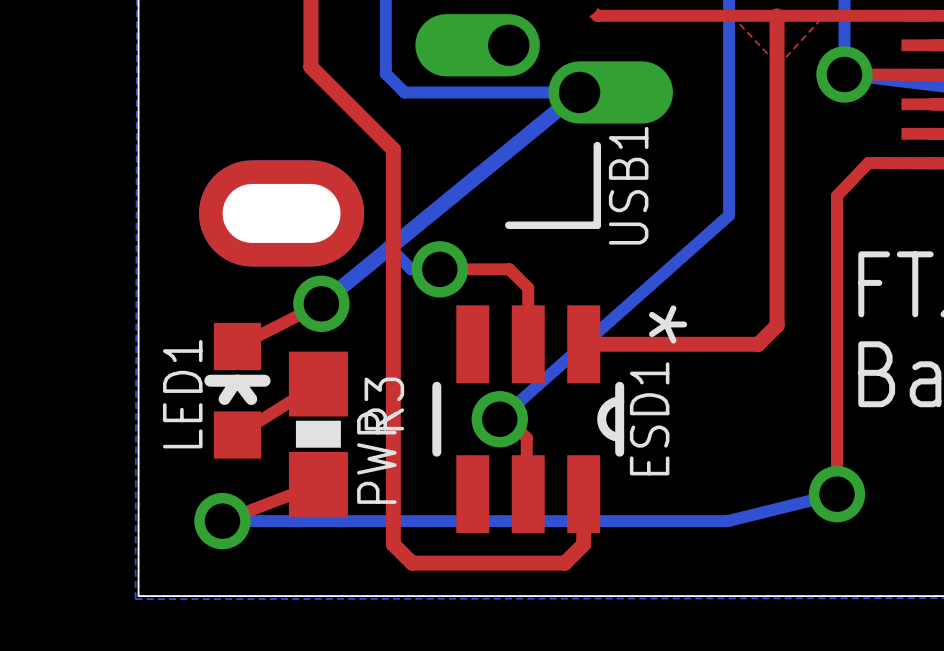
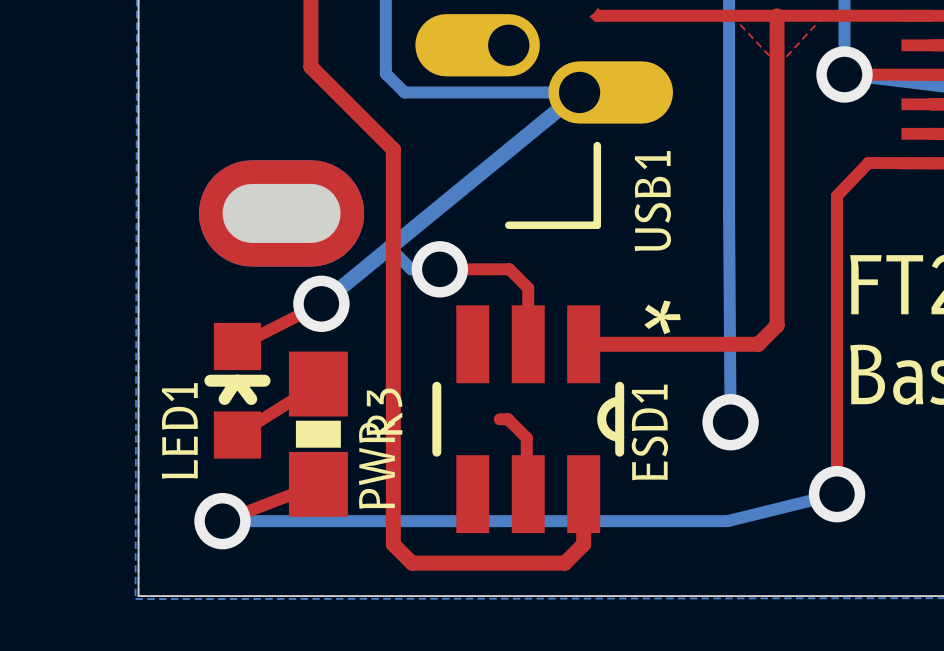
USB1 name position: USB1 (628, 185) -> USB1 (652, 201)
bottom track: (729, 215) (499, 419) -> (729, 215) (730, 422)
LED1 name position: LED1 (182, 394) -> LED1 (179, 430)
via position: (499, 419) -> (730, 422)

